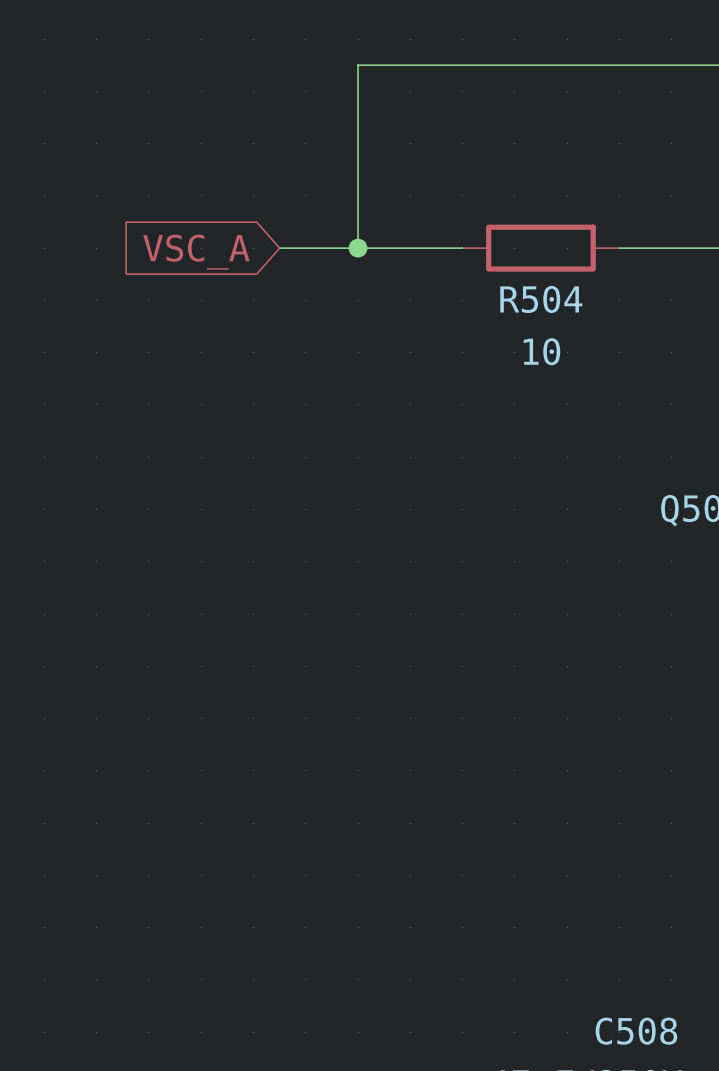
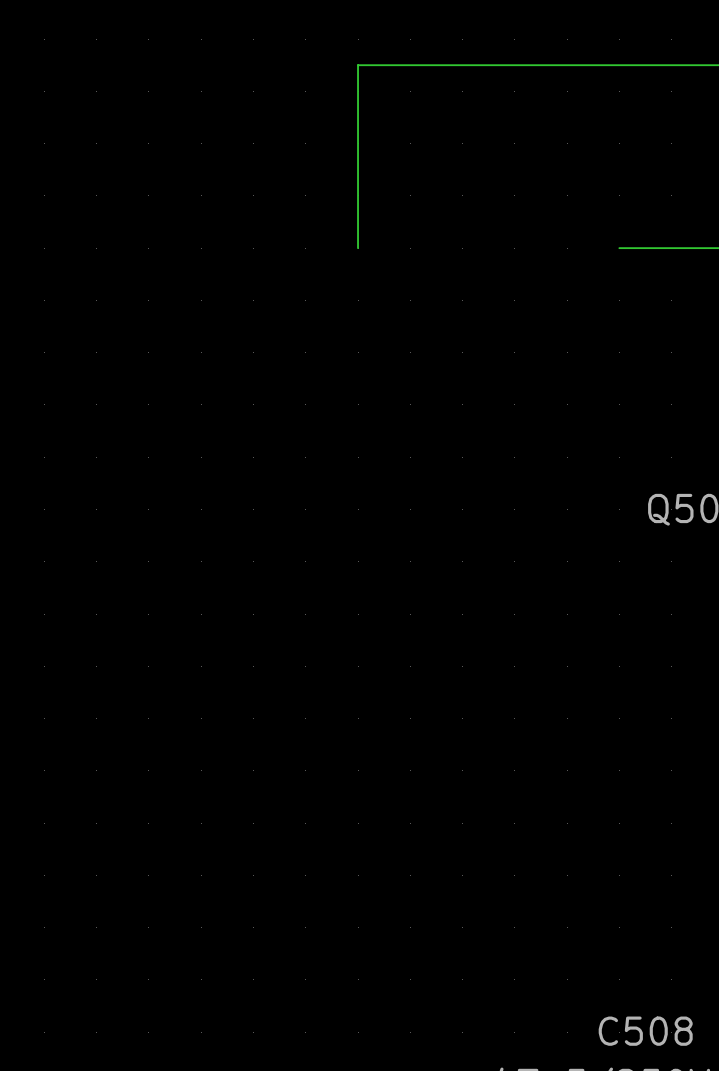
wire: (279, 248) (462, 248) -> none
junction: (358, 248) -> none
R504: 10 (540, 248) -> none
global label: VSC_A (196, 252) -> none

